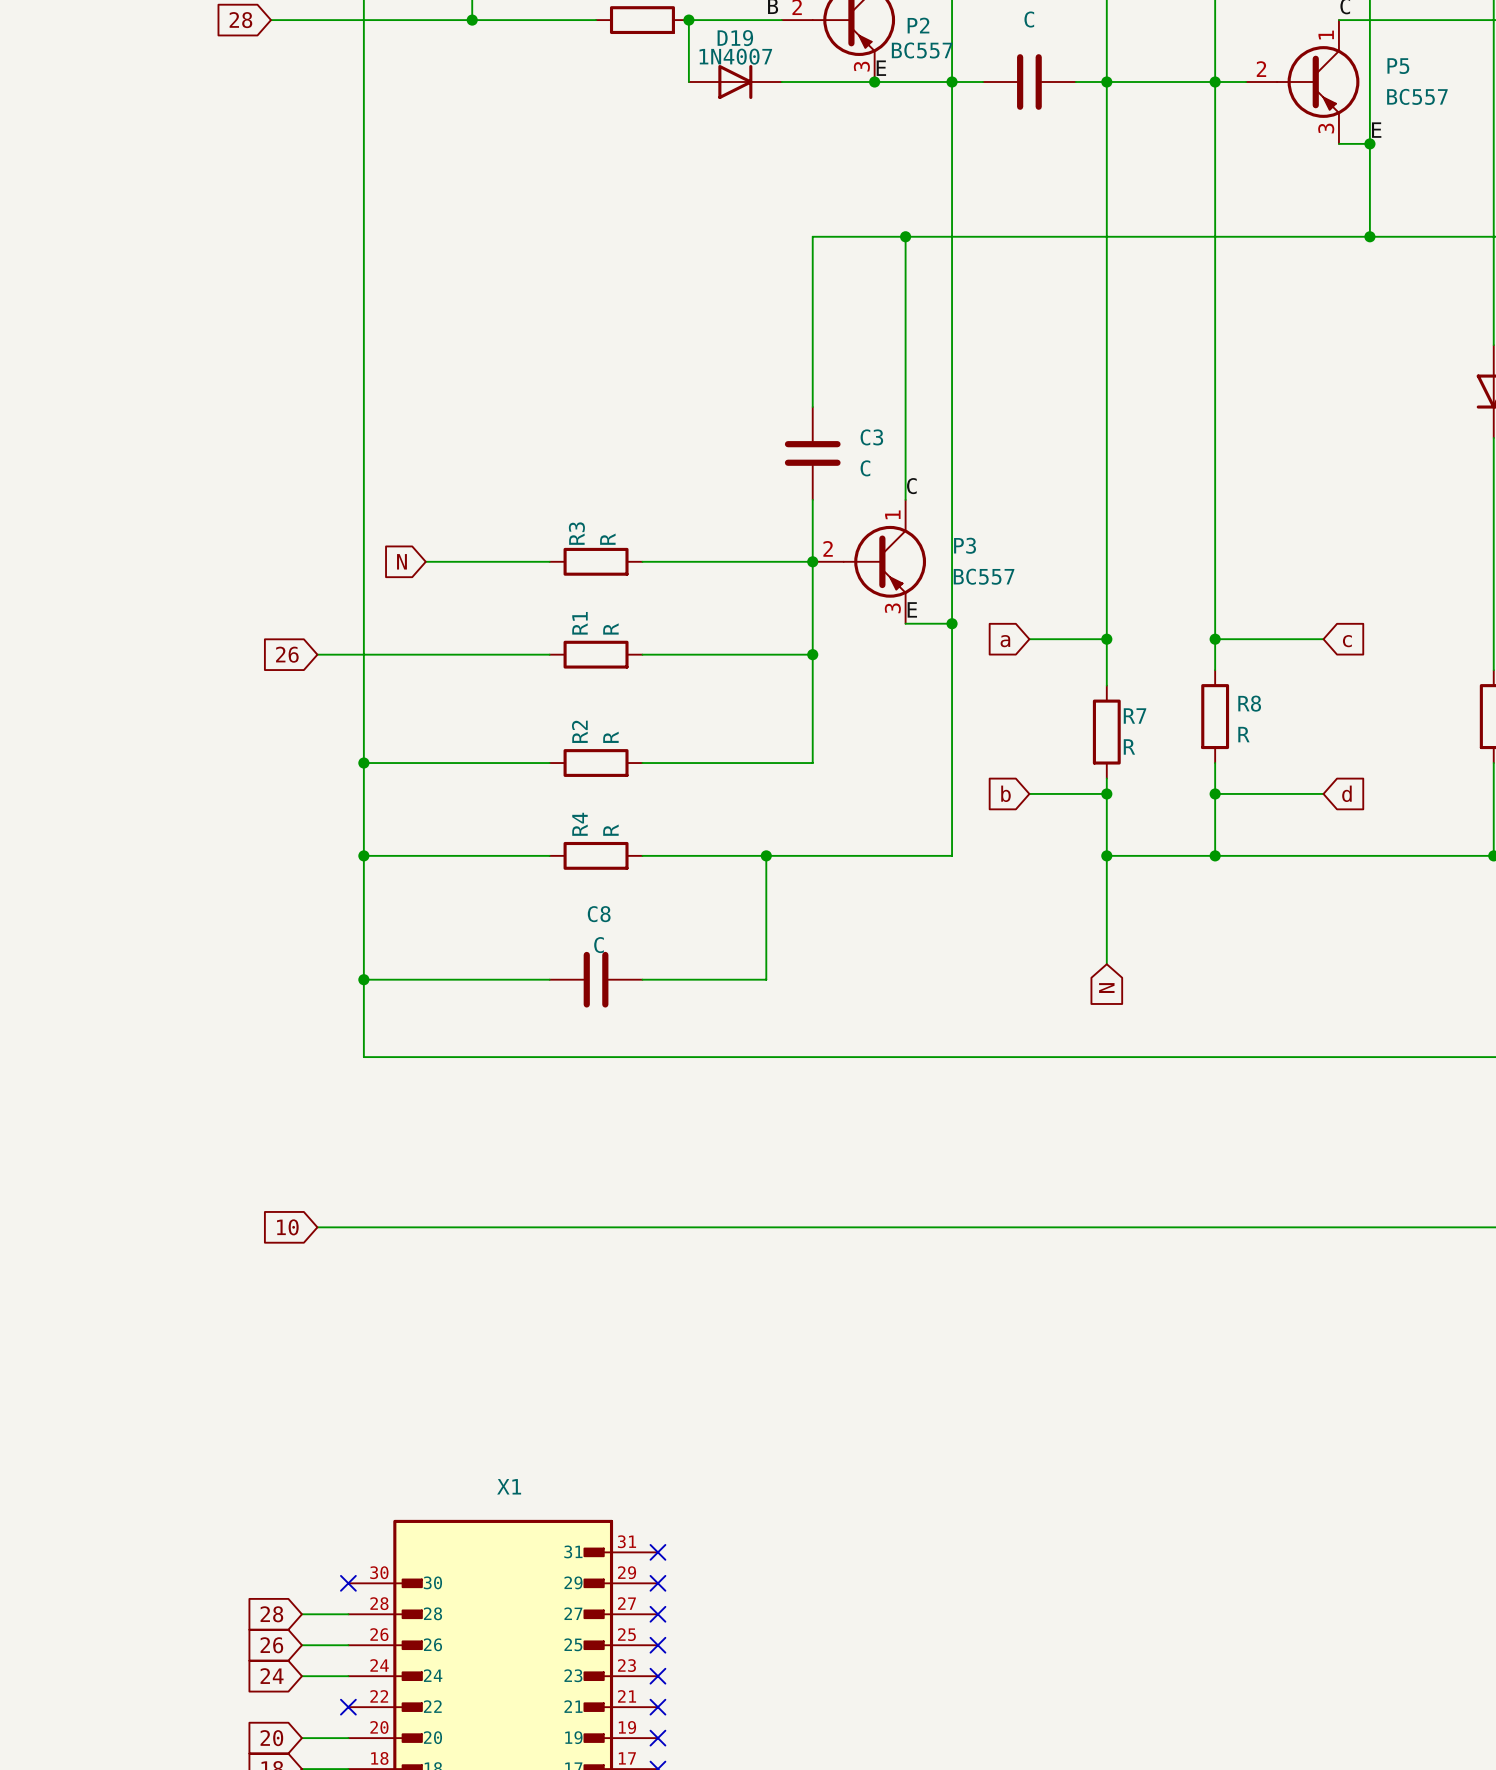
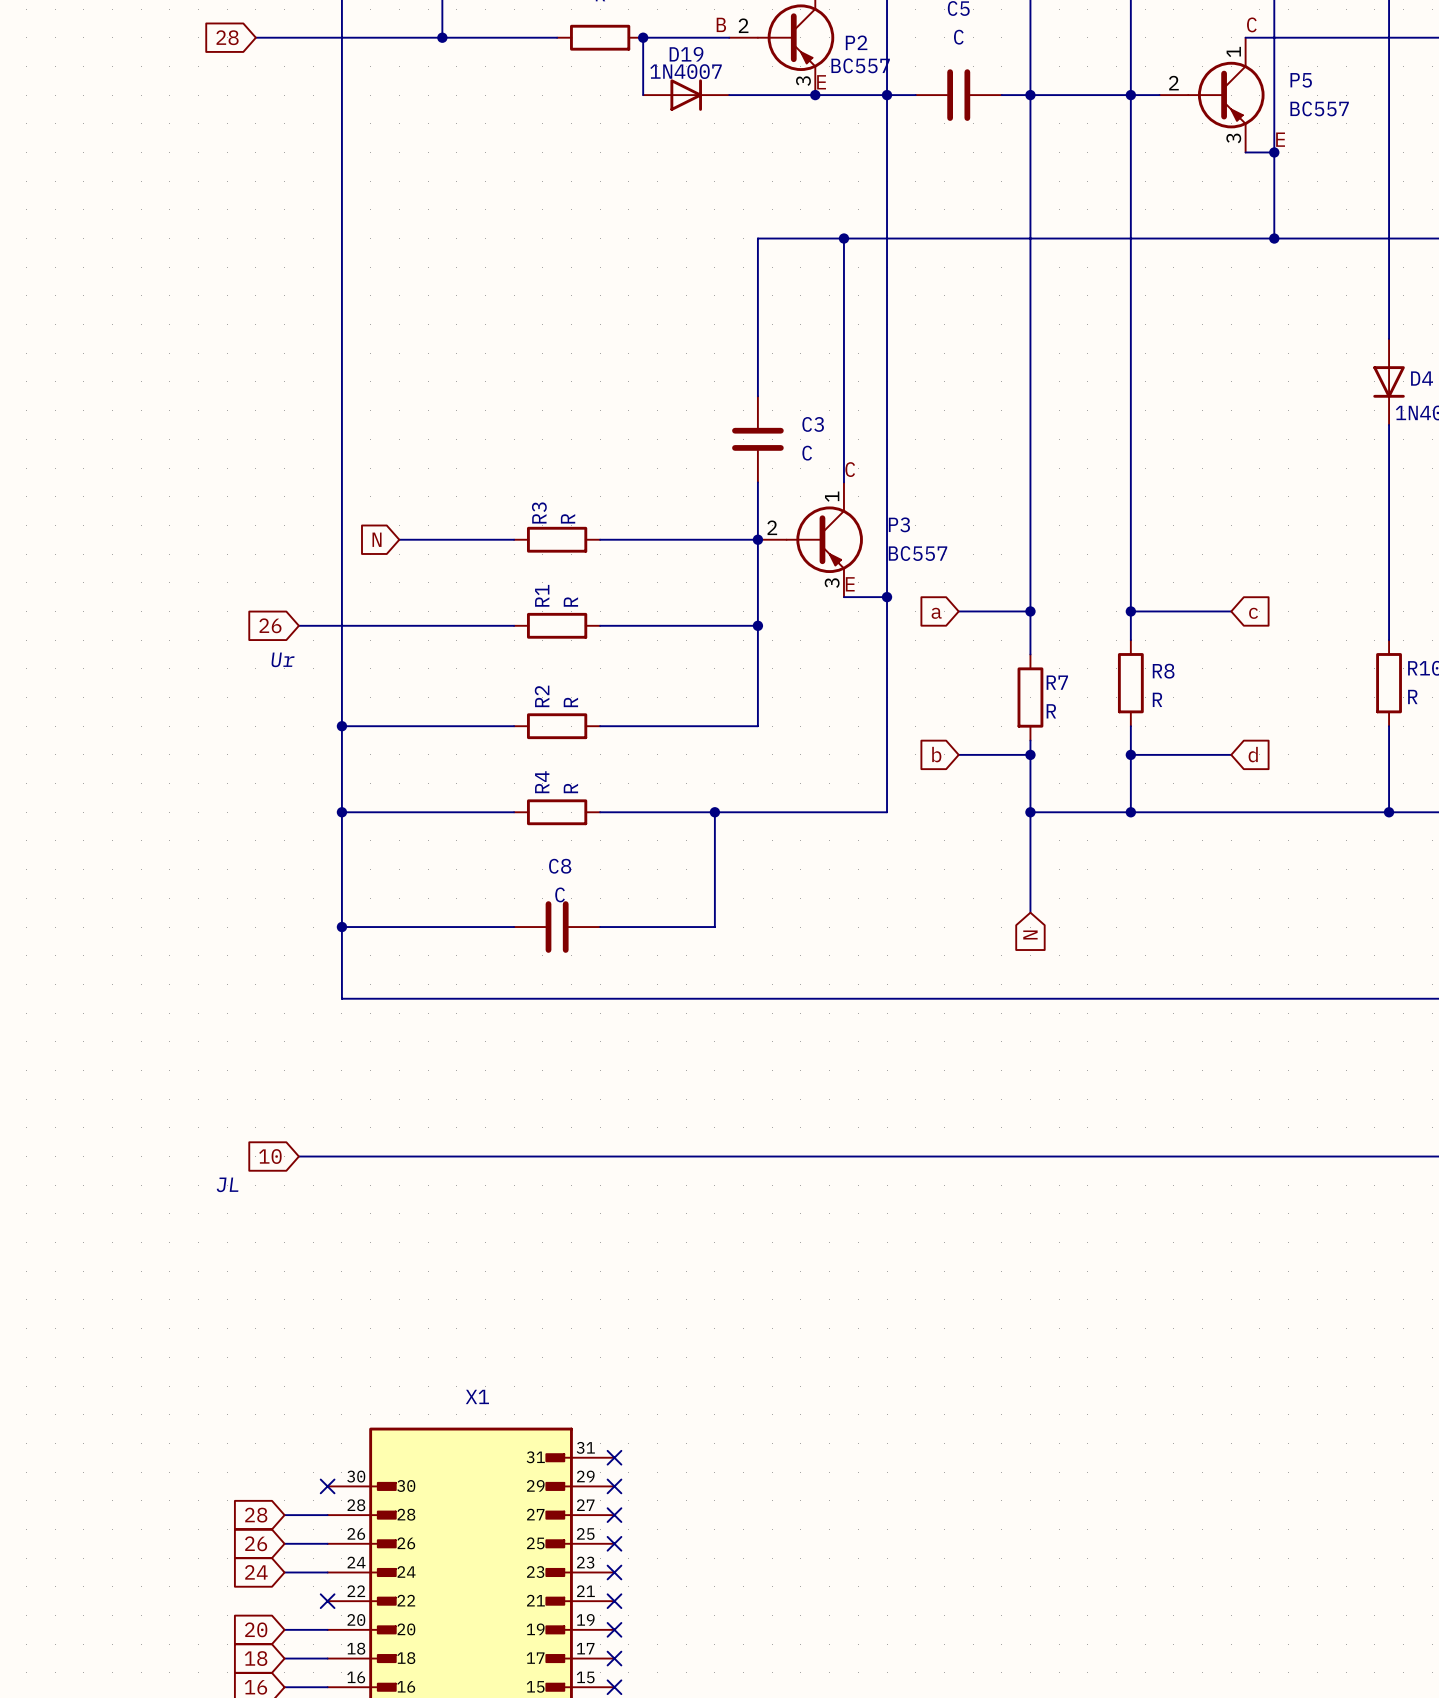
text: none -> Ur (283, 659)
text: none -> JL (227, 1184)

